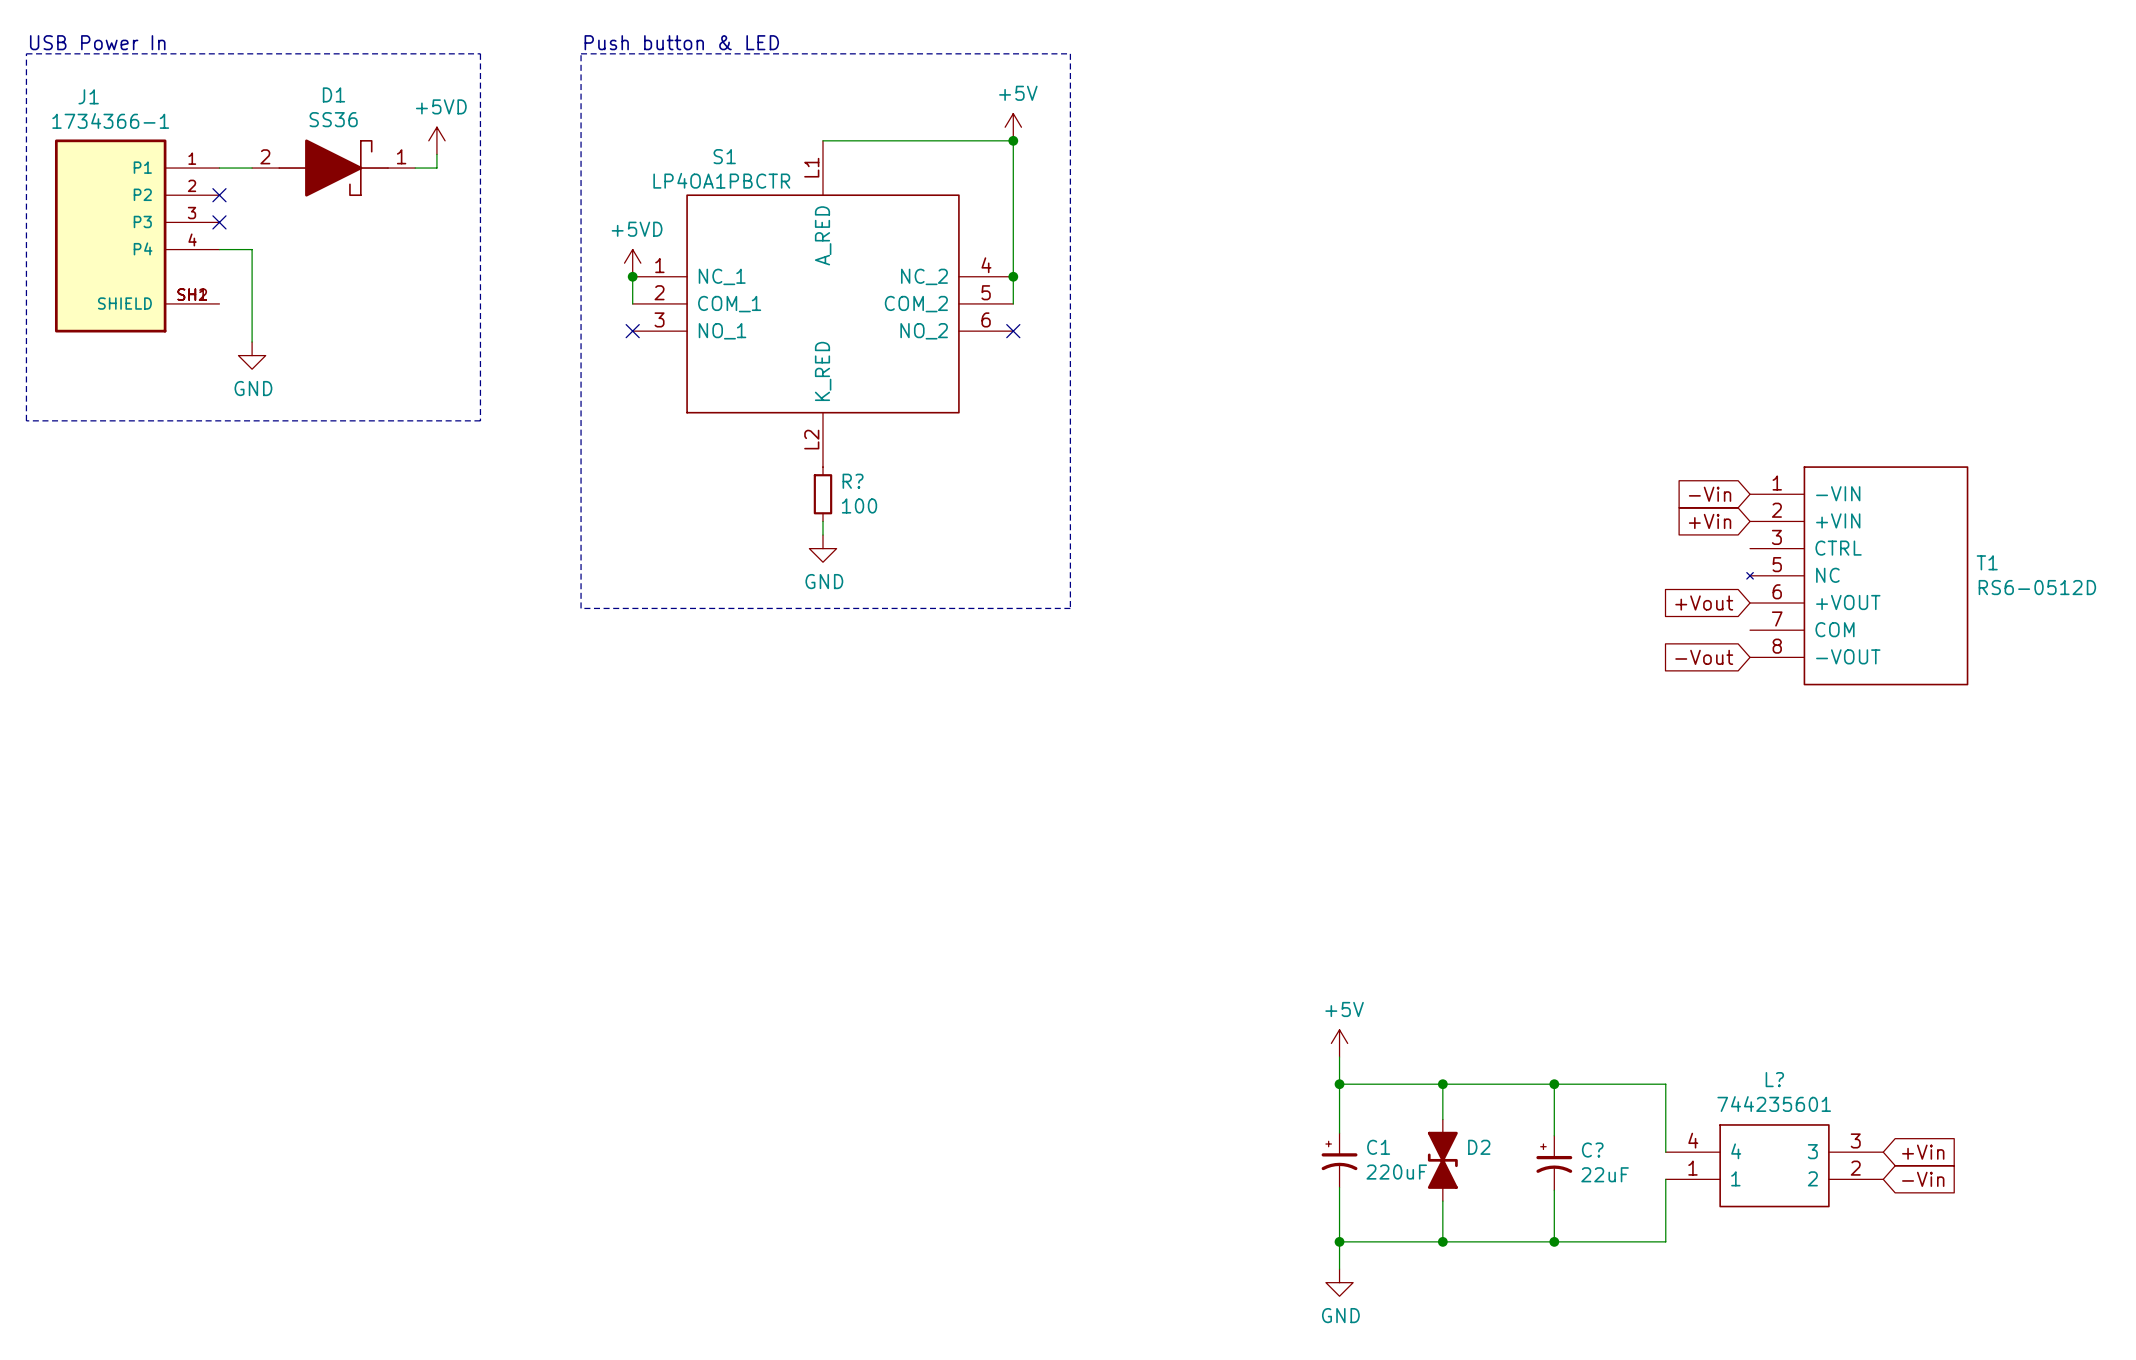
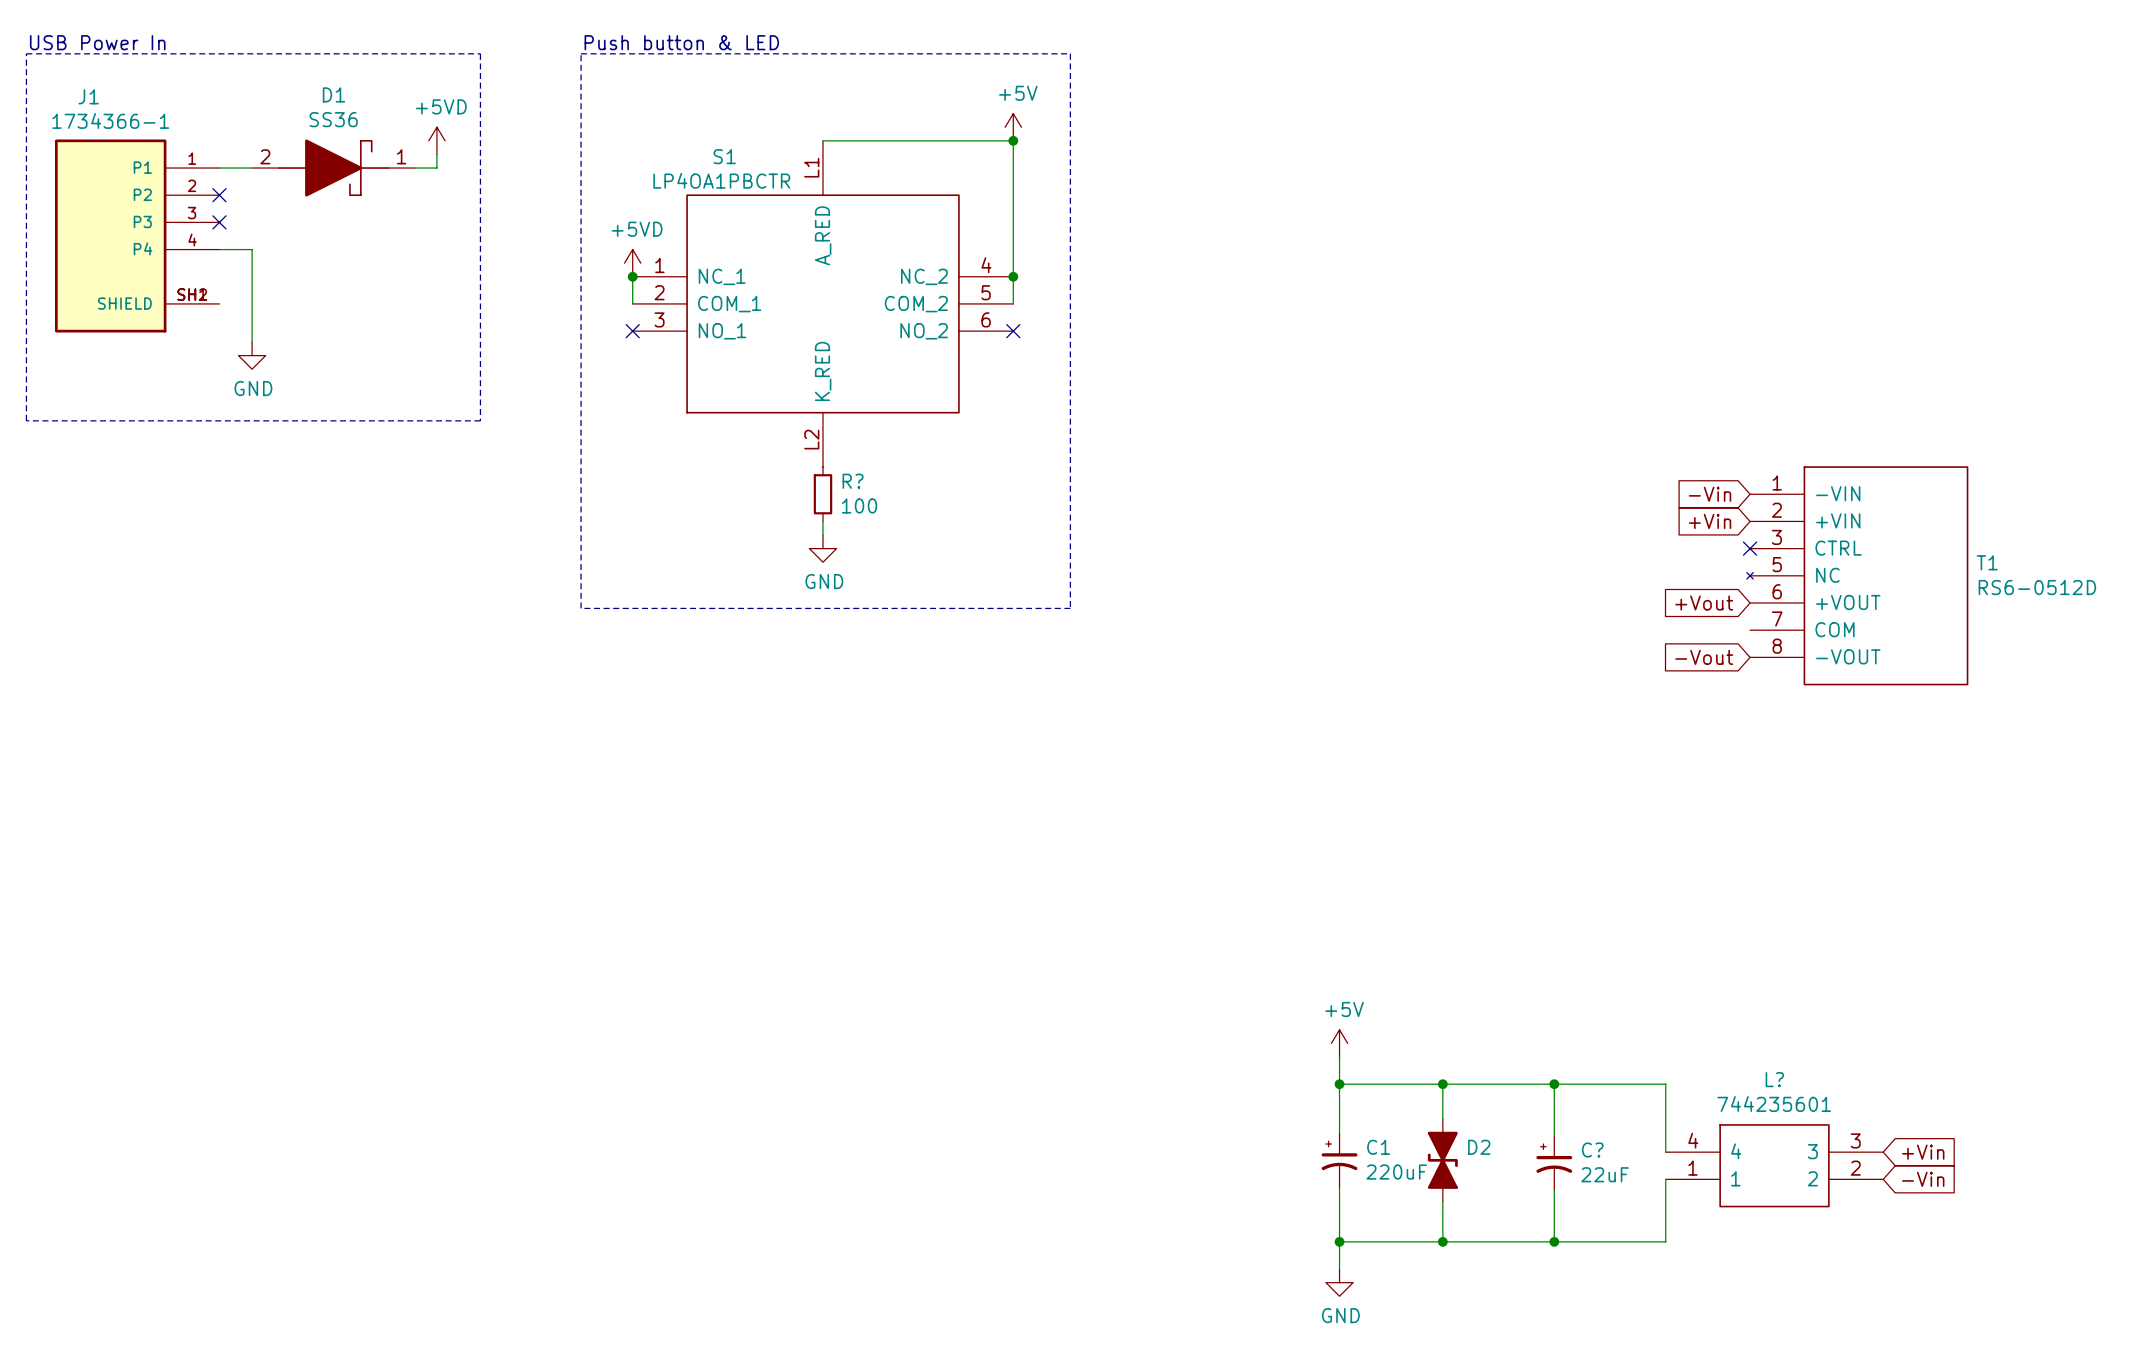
no-connect mark: none -> (1750, 548)

